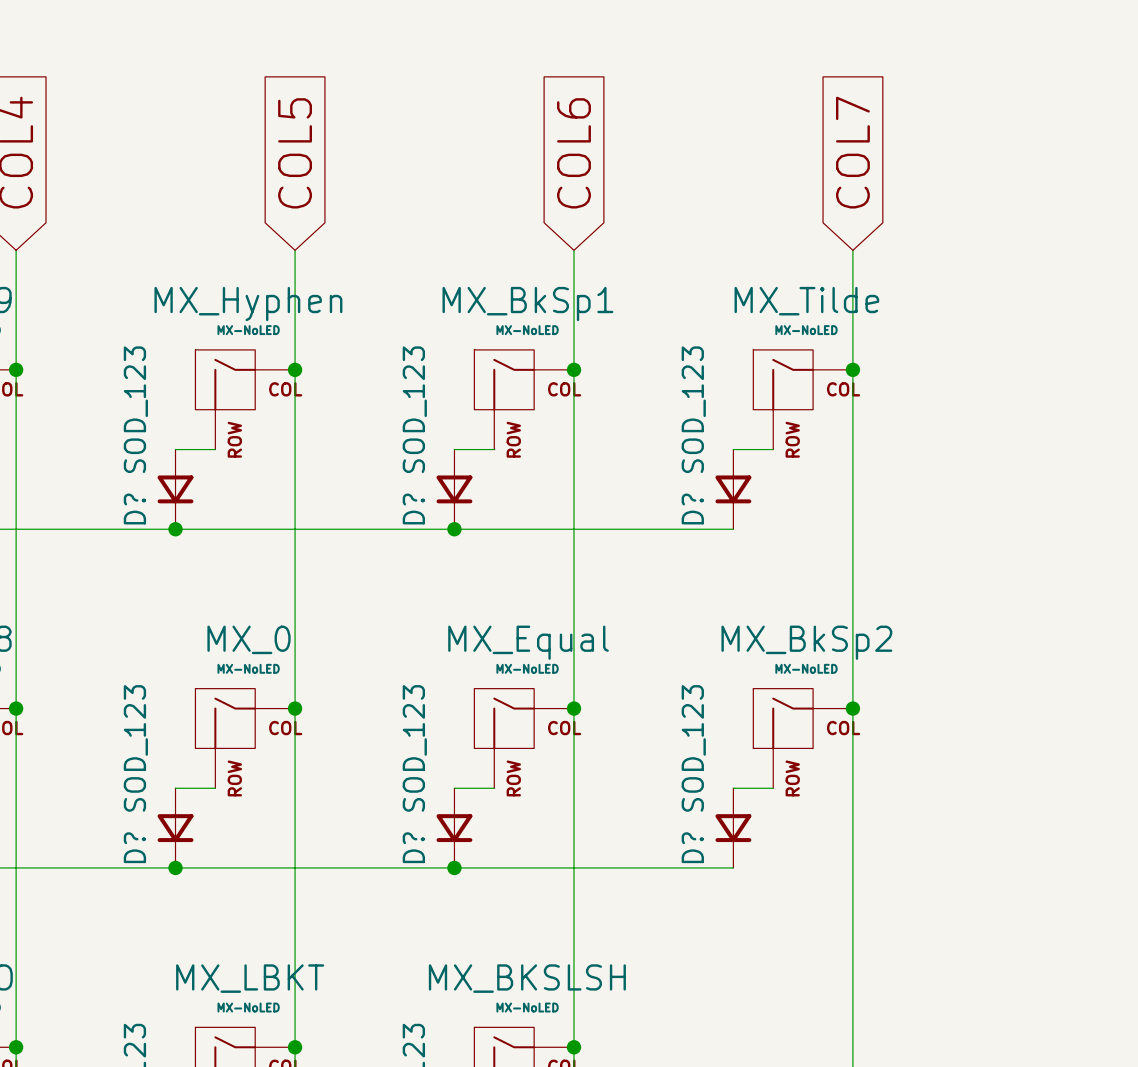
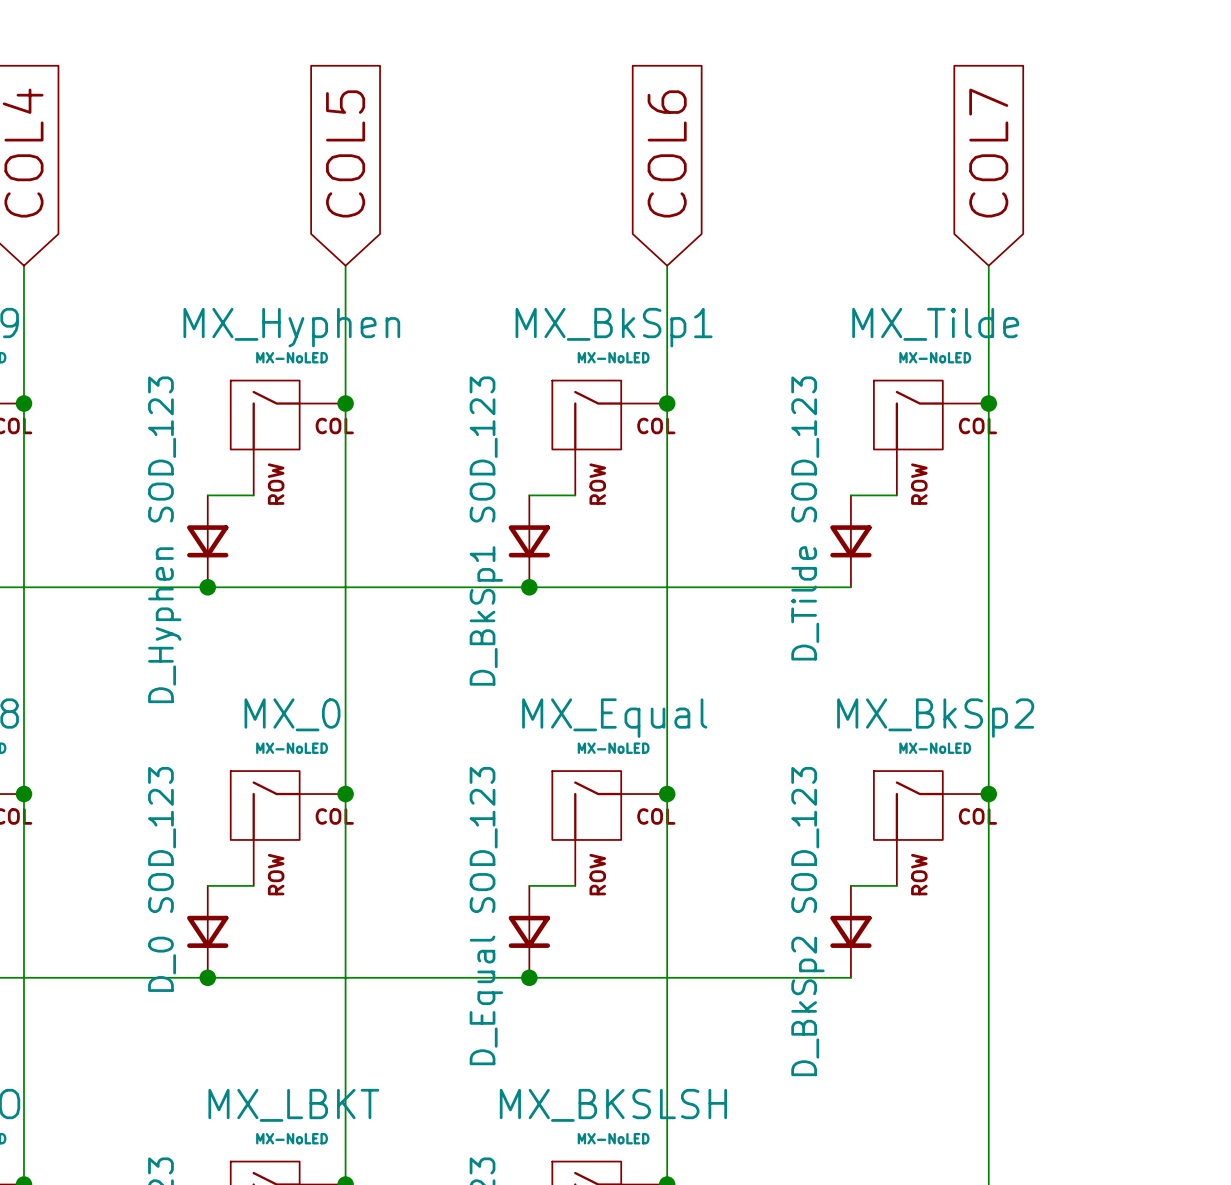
D? name: D? (134, 509) -> D_Hyphen (164, 625)
D? name: D? (413, 509) -> D_BkSp1 (486, 615)
D? name: D? (692, 509) -> D_Tilde (805, 603)
D? name: D? (134, 847) -> D_0 (162, 964)
D? name: D? (413, 847) -> D_Equal (486, 1000)
D? name: D? (692, 847) -> D_BkSp2 (807, 1006)

